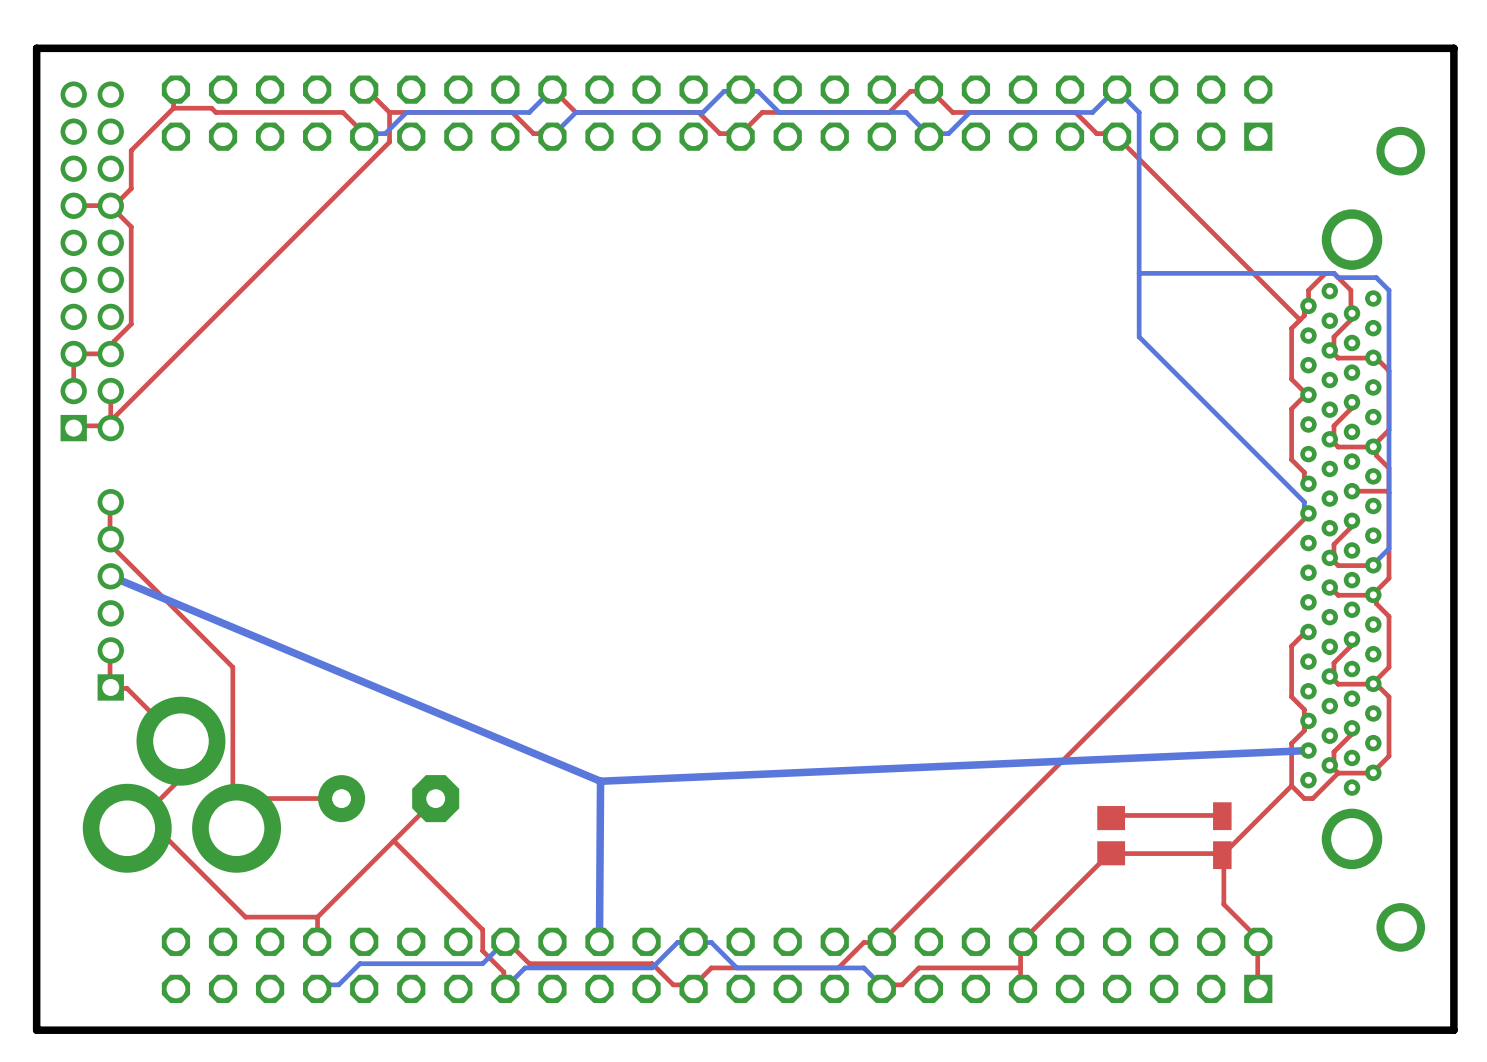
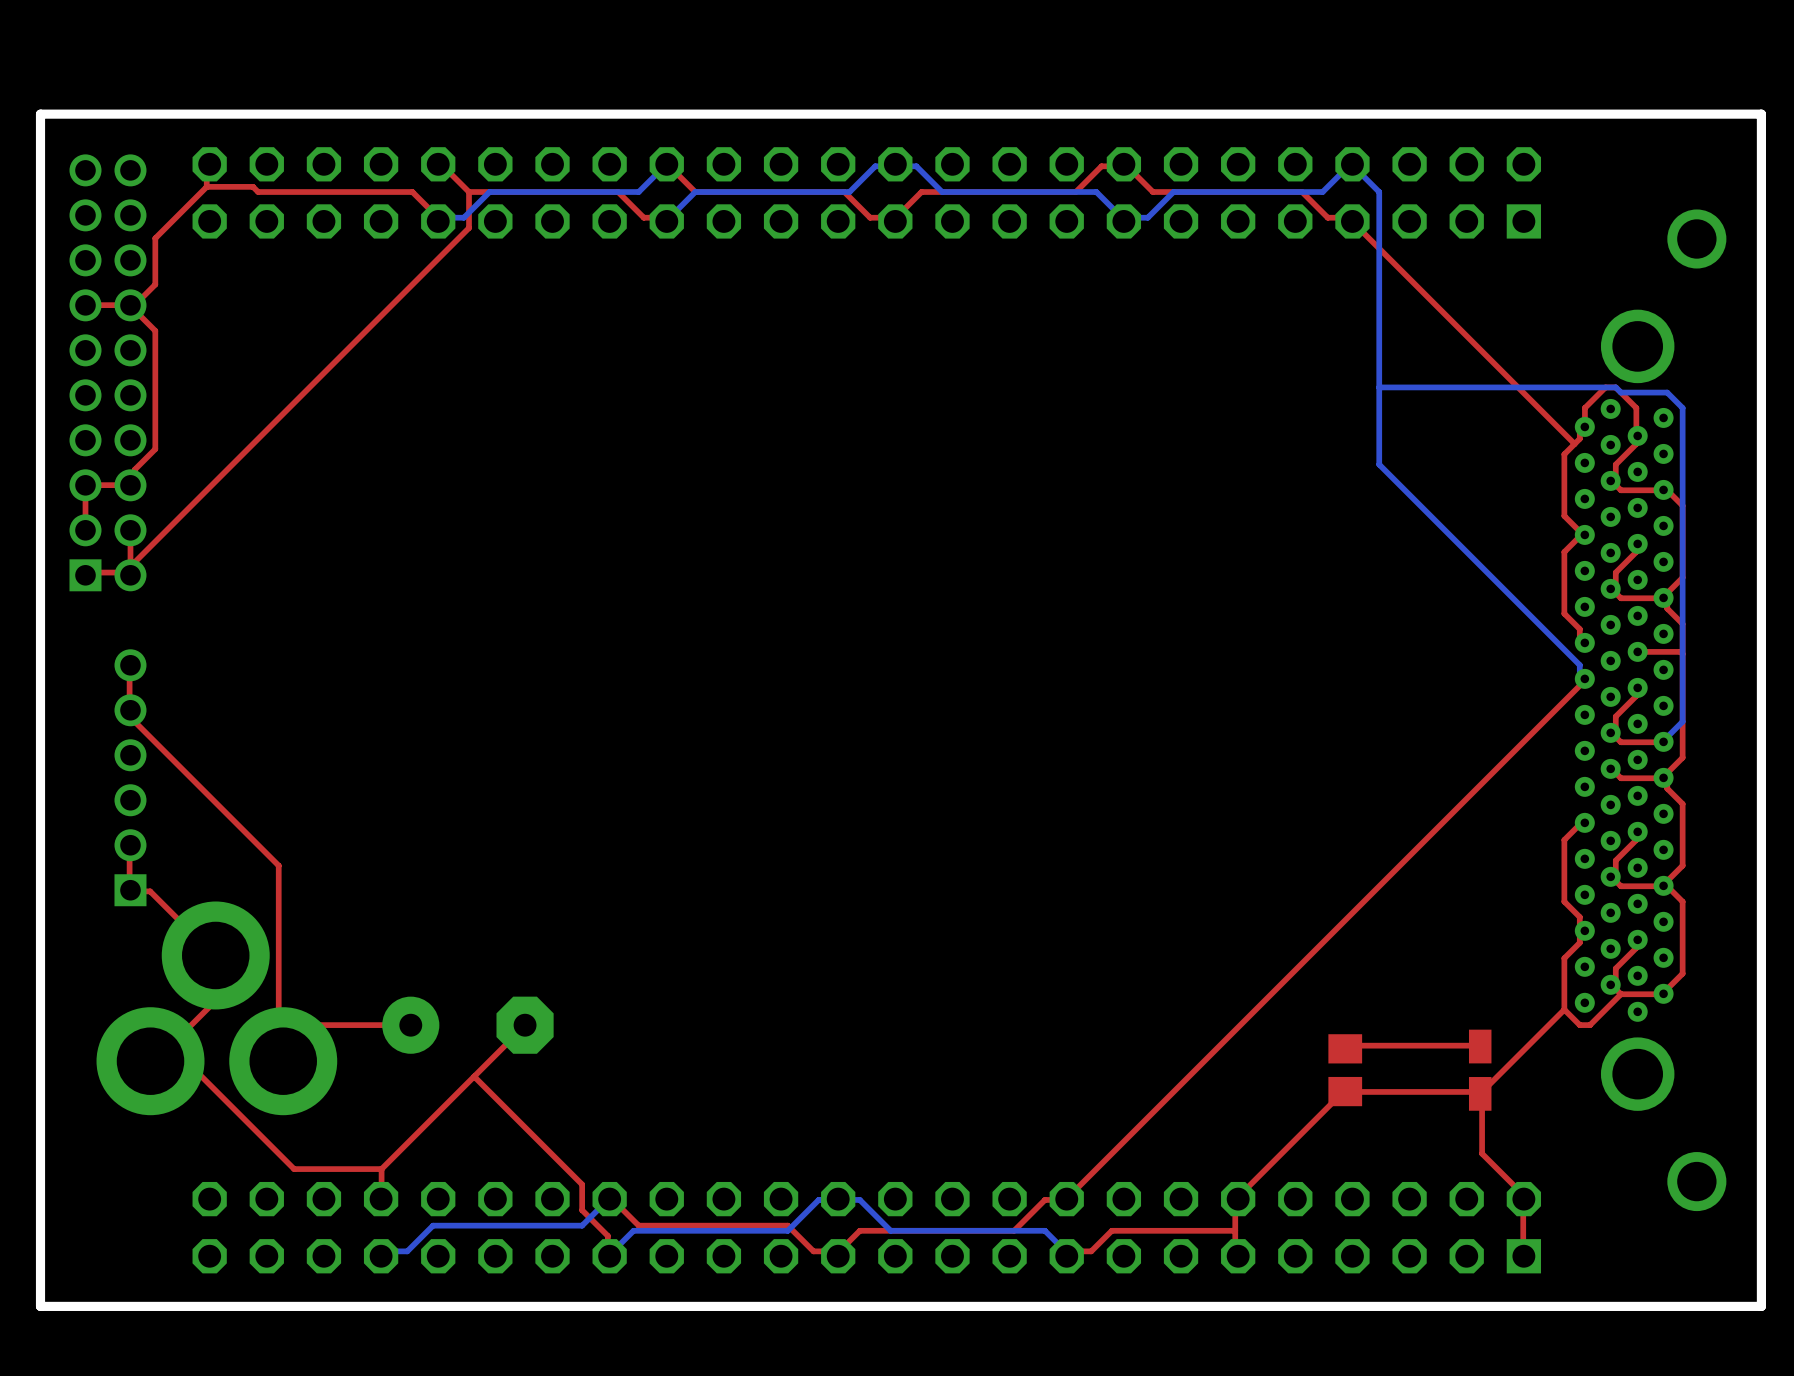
bottom track: (110, 576) (600, 781) -> none
bottom track: (1308, 750) (600, 781) -> none
bottom track: (600, 781) (599, 941) -> none

